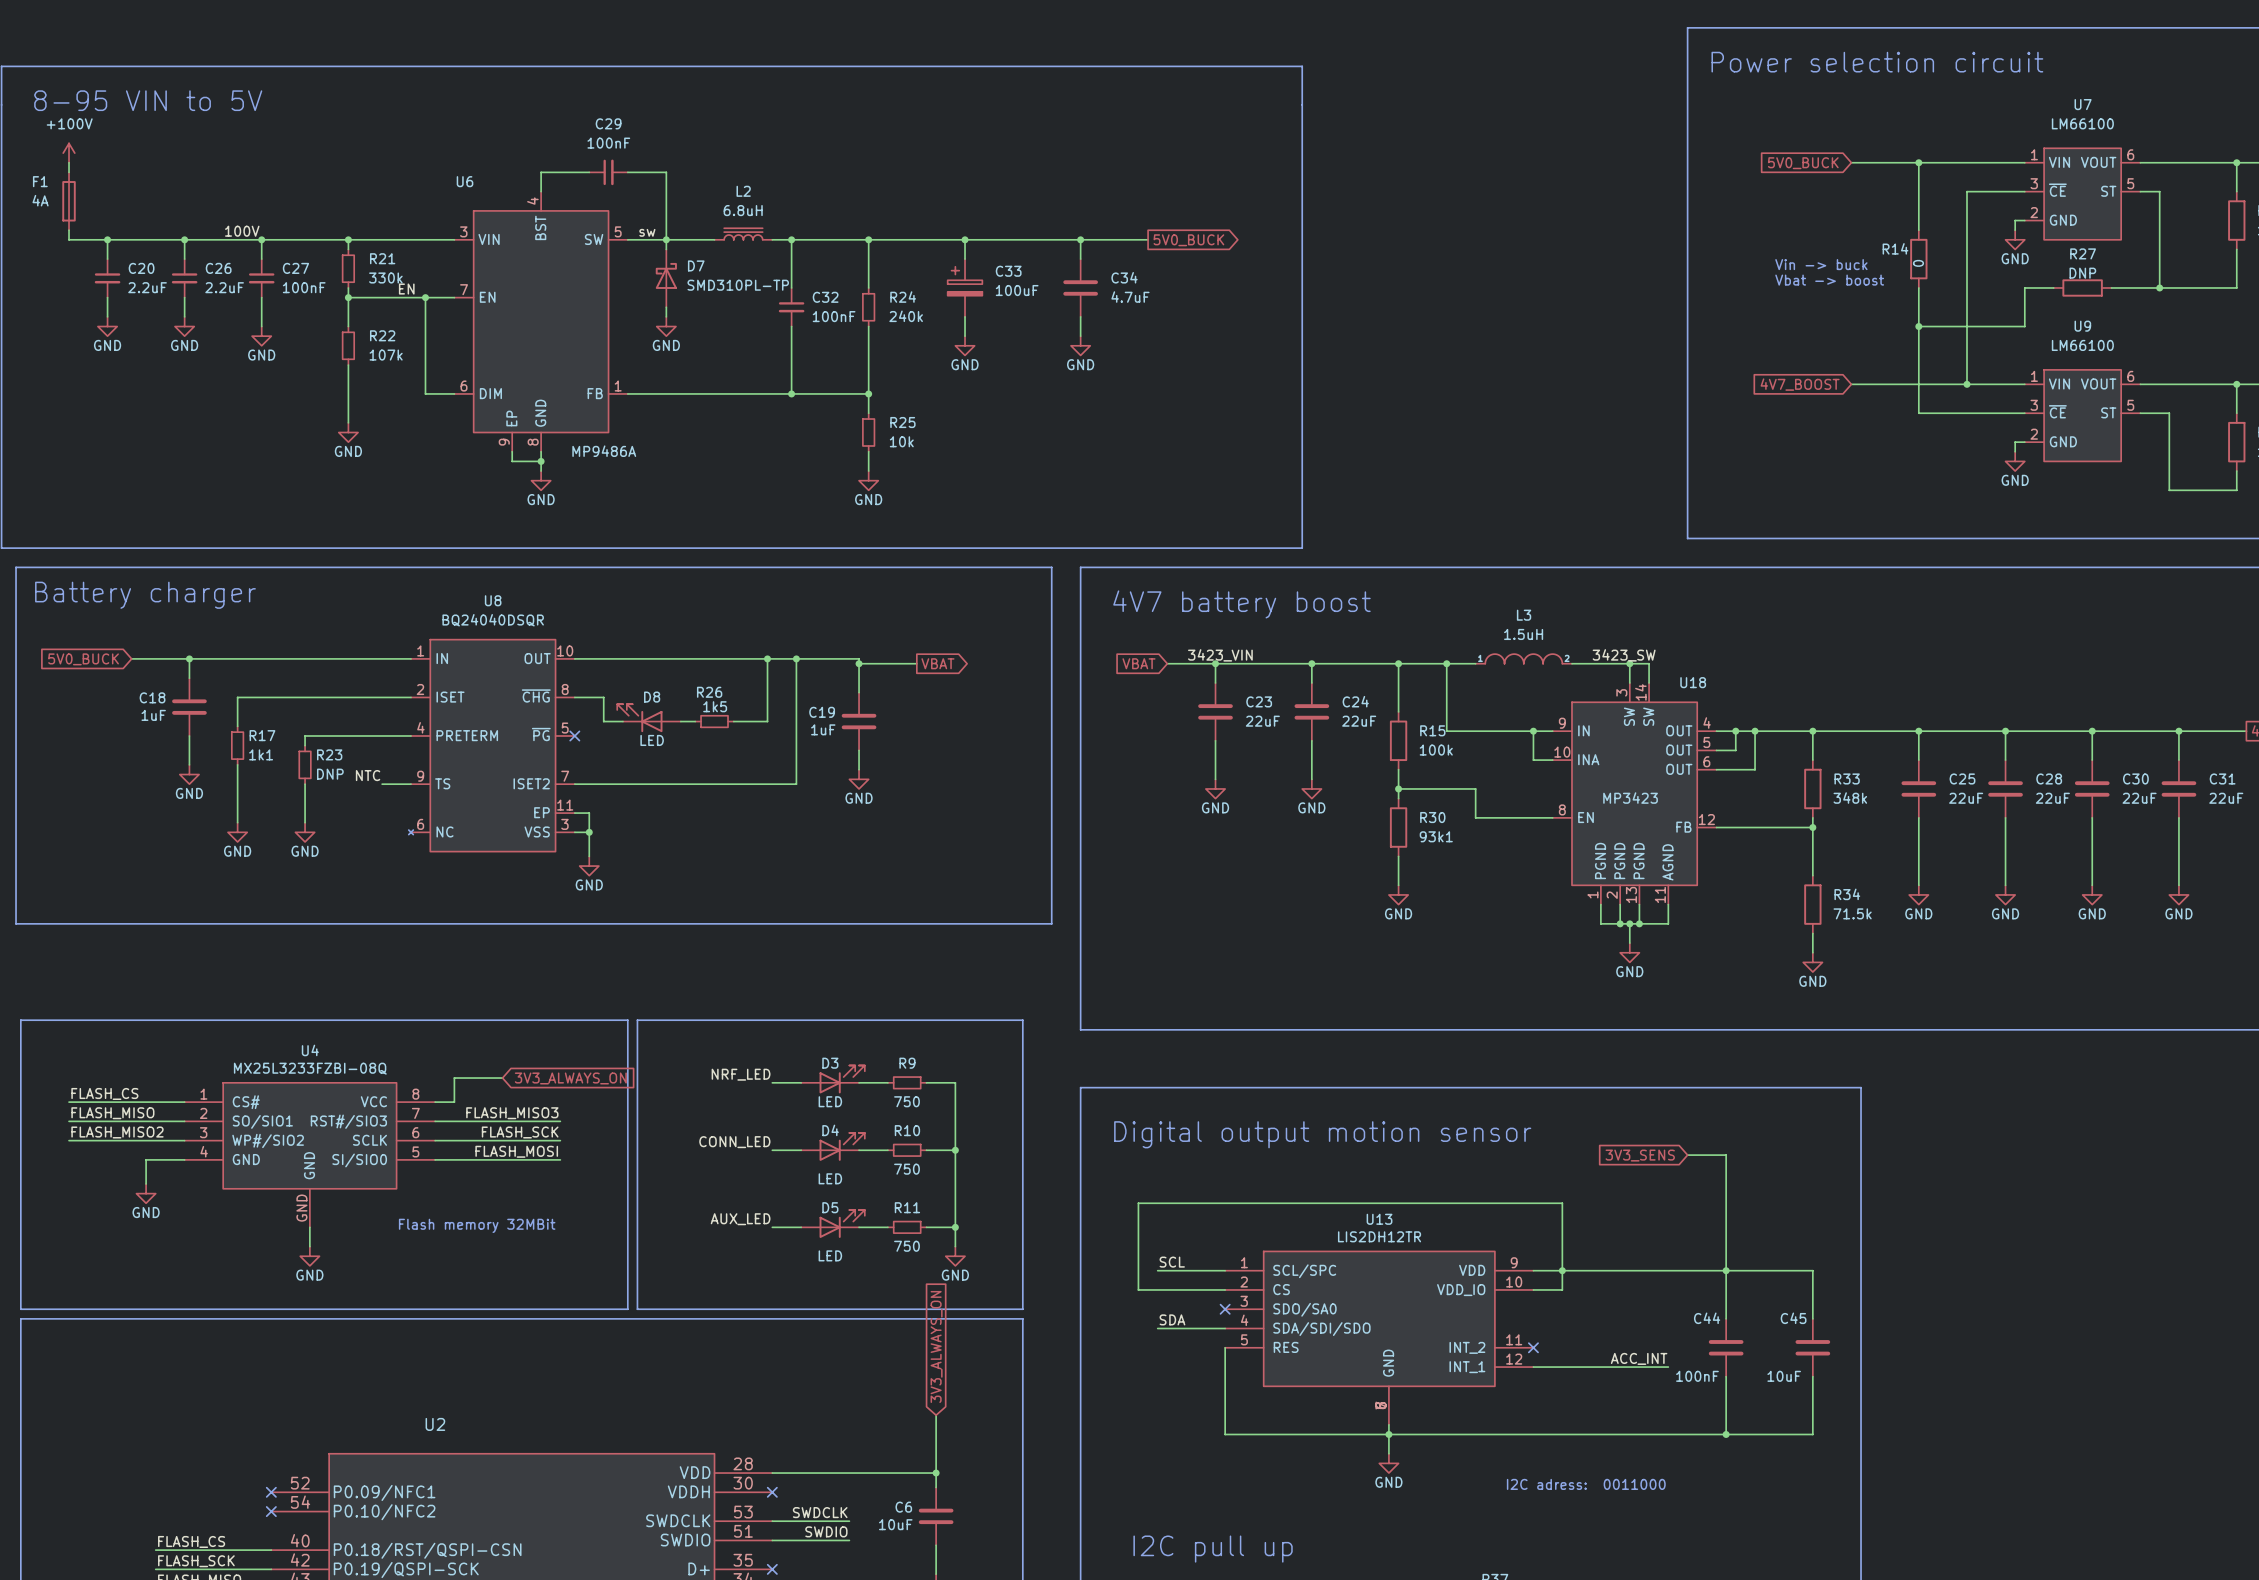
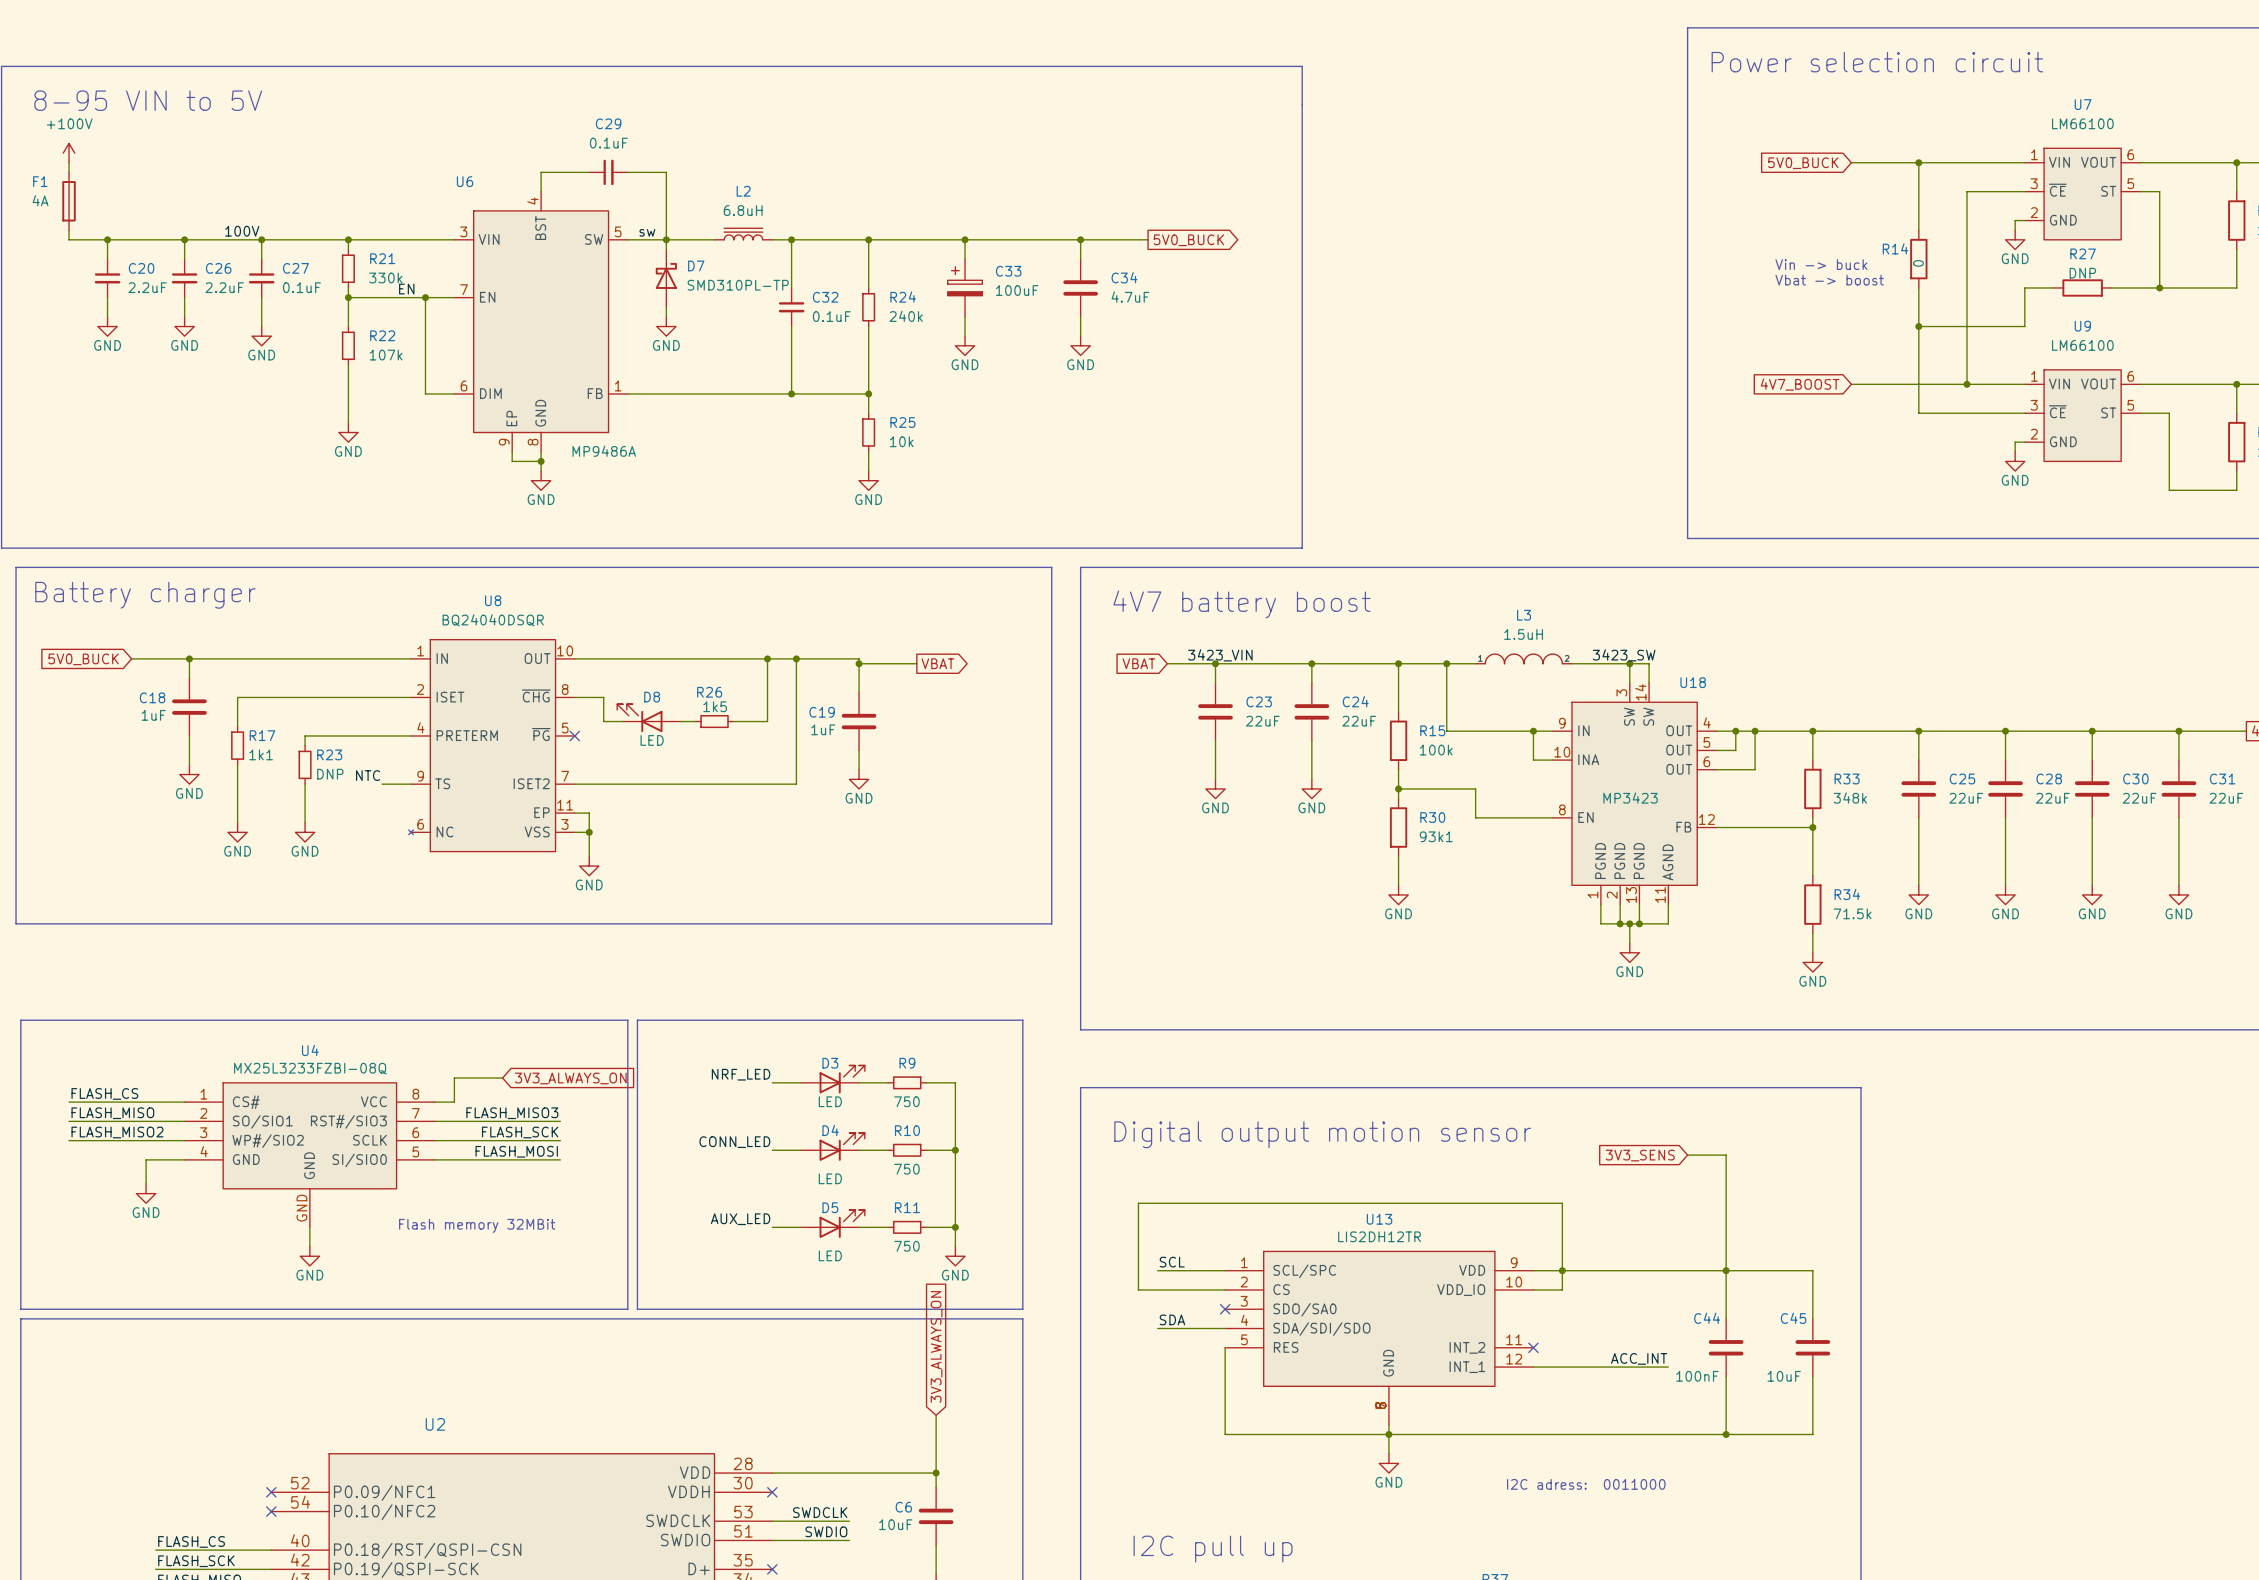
C29 value: 100nF (608, 143) -> 0.1uF (608, 143)
C27 value: 100nF (304, 287) -> 0.1uF (301, 287)
C32 value: 100nF (834, 316) -> 0.1uF (831, 316)

